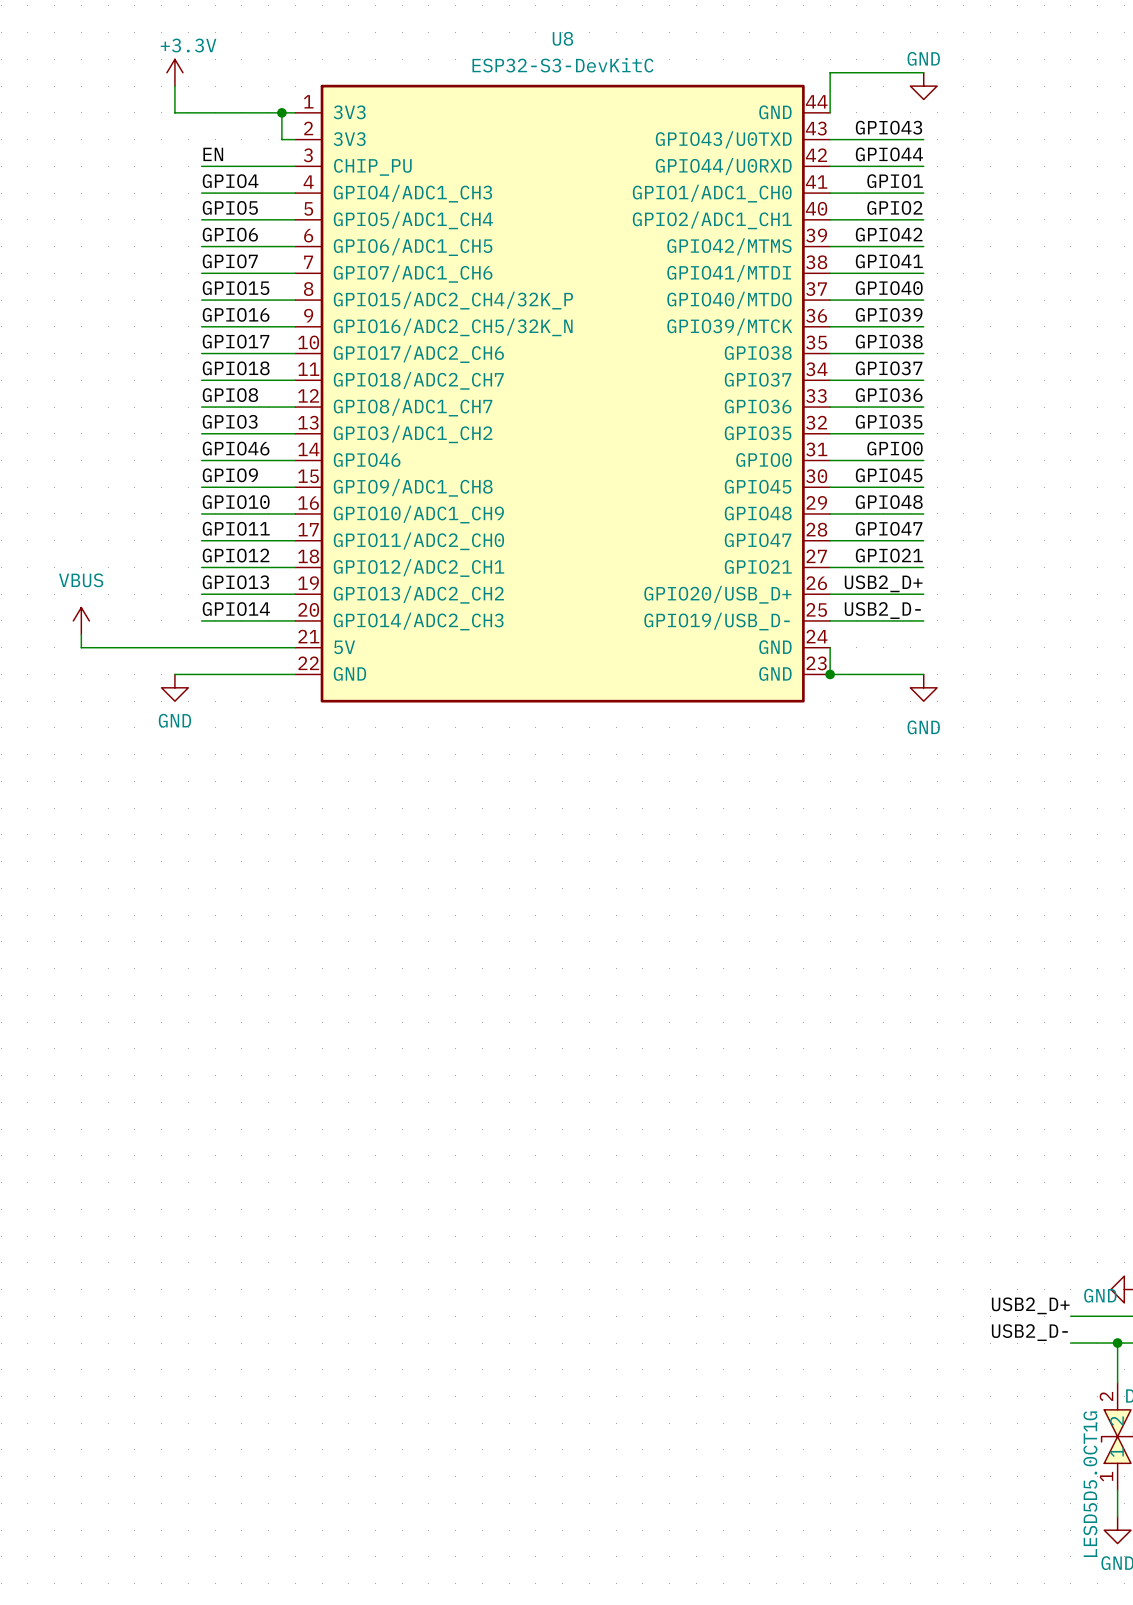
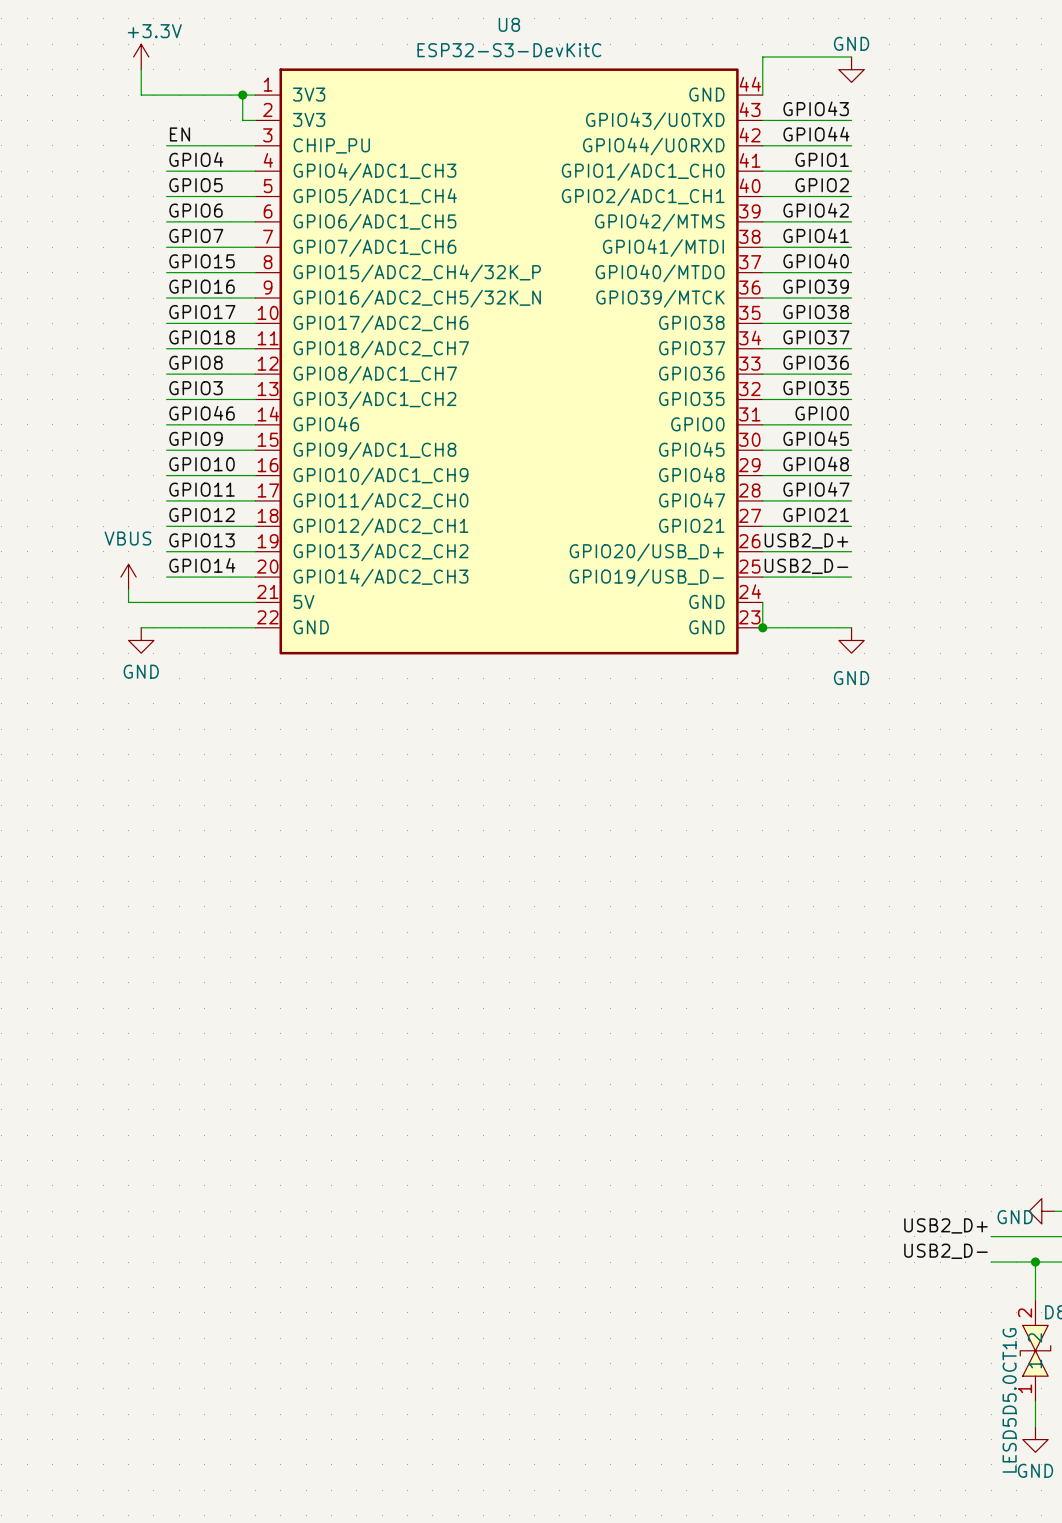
power symbol position: VBUS (81, 620) -> VBUS (128, 577)
wire: (81, 634) (81, 647) (161, 647) -> (128, 589) (128, 602)

